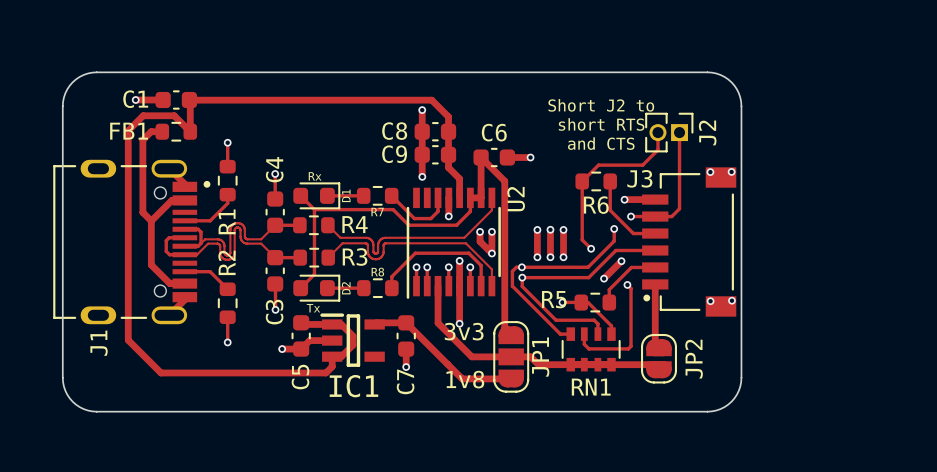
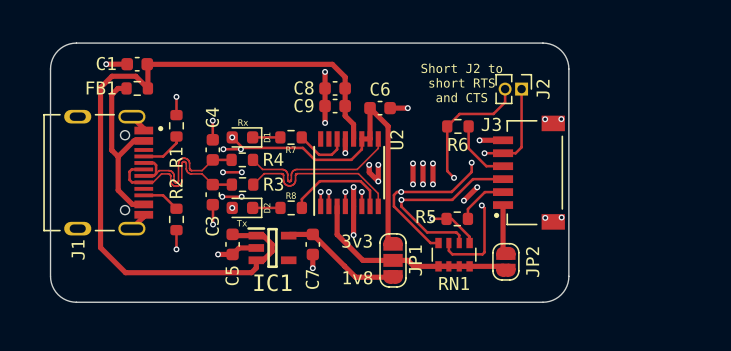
via: none -> (232, 137)
track: (314, 209) (314, 274) (300, 288) -> none
track: none -> (223, 149) (240, 149)
via: none -> (223, 149)
via: none -> (240, 149)
track: none -> (222, 172) (241, 172)
via: none -> (222, 172)
via: none -> (241, 172)
track: none -> (222, 196) (241, 196)
via: none -> (222, 196)
via: none -> (241, 196)
via: none -> (232, 207)

